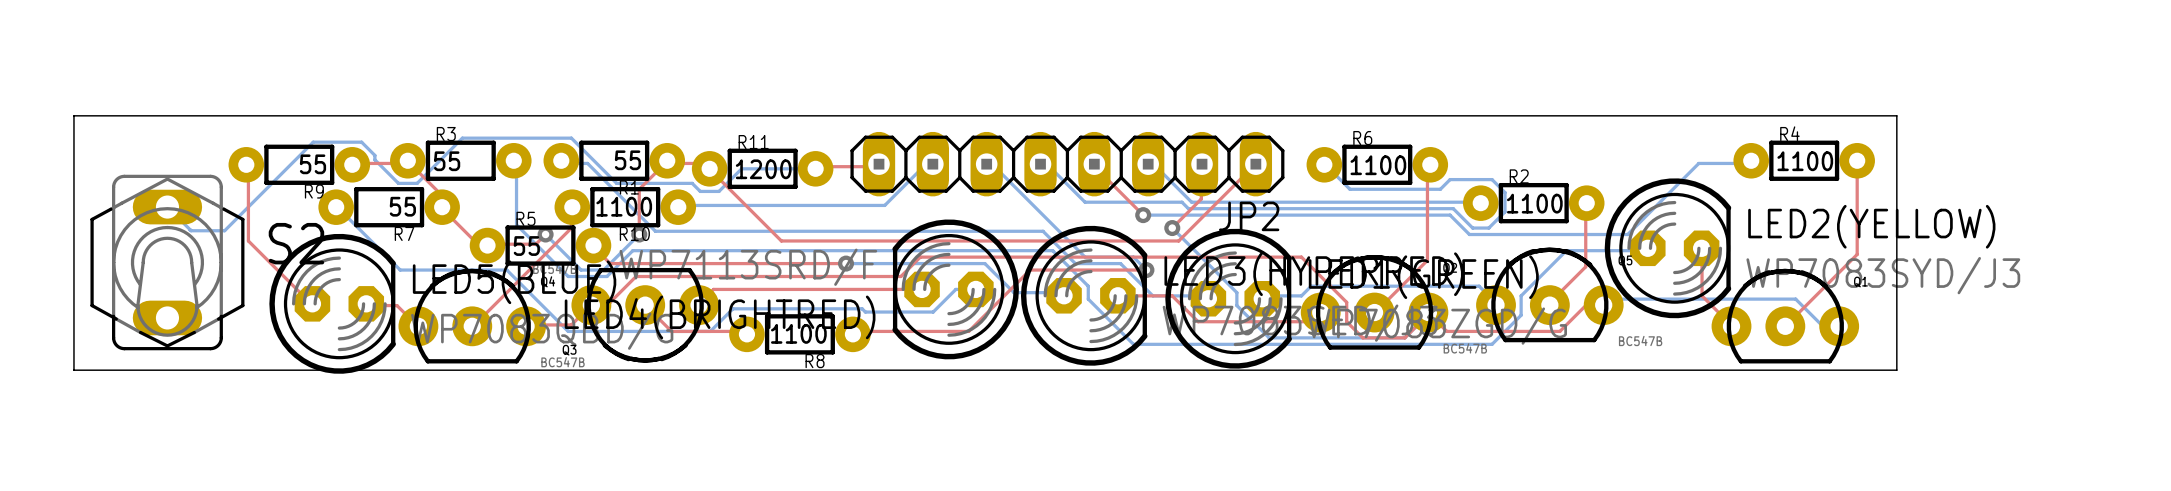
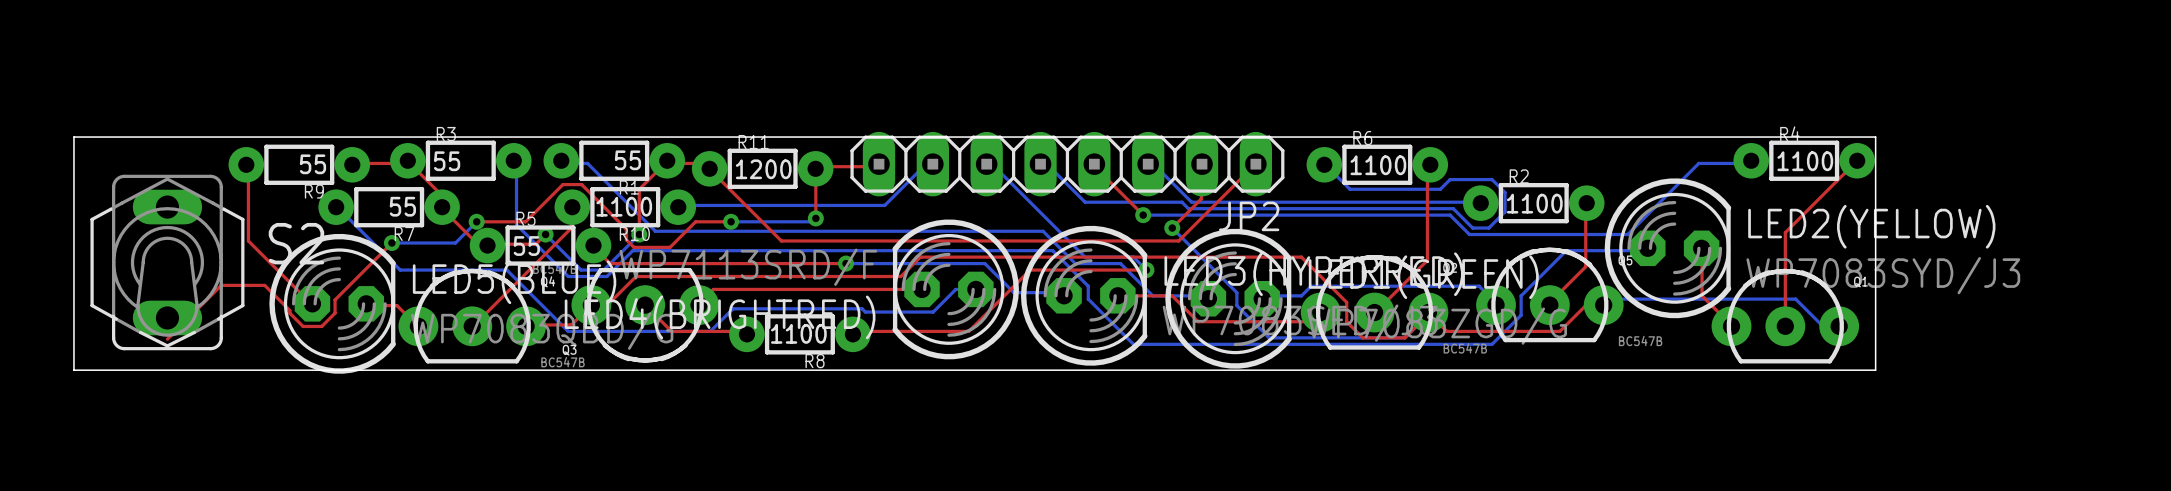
board edge: (73, 137) (73, 115) (1896, 115) (1896, 370) (1875, 370) -> (73, 137) (1875, 137) (1875, 370)
top track: (1857, 160) (1857, 254) (1785, 326) -> (1857, 160) (1785, 232) (1785, 326)
bottom track: (815, 168) (741, 168) (719, 191) (700, 191) (692, 183) (616, 183) (571, 138) (462, 138) (417, 183) (398, 183) (374, 159) (374, 155) (361, 142) (313, 142) (224, 230) (191, 230) (167, 207) -> none
top track: none -> (815, 169) (815, 221)
bottom track: none -> (815, 218) (812, 221) (731, 221)
via: none -> (815, 218)
bottom track: none -> (476, 221) (455, 243) (391, 243)
top track: none -> (476, 221) (525, 221) (562, 184) (581, 184) (626, 229) (626, 239) (633, 247) (670, 247) (695, 221) (731, 221)
via: none -> (476, 221)
via: none -> (731, 221)
top track: none -> (391, 243) (335, 299) (335, 313) (321, 326) (303, 326) (264, 285) (221, 285) (167, 339)
via: none -> (391, 243)

